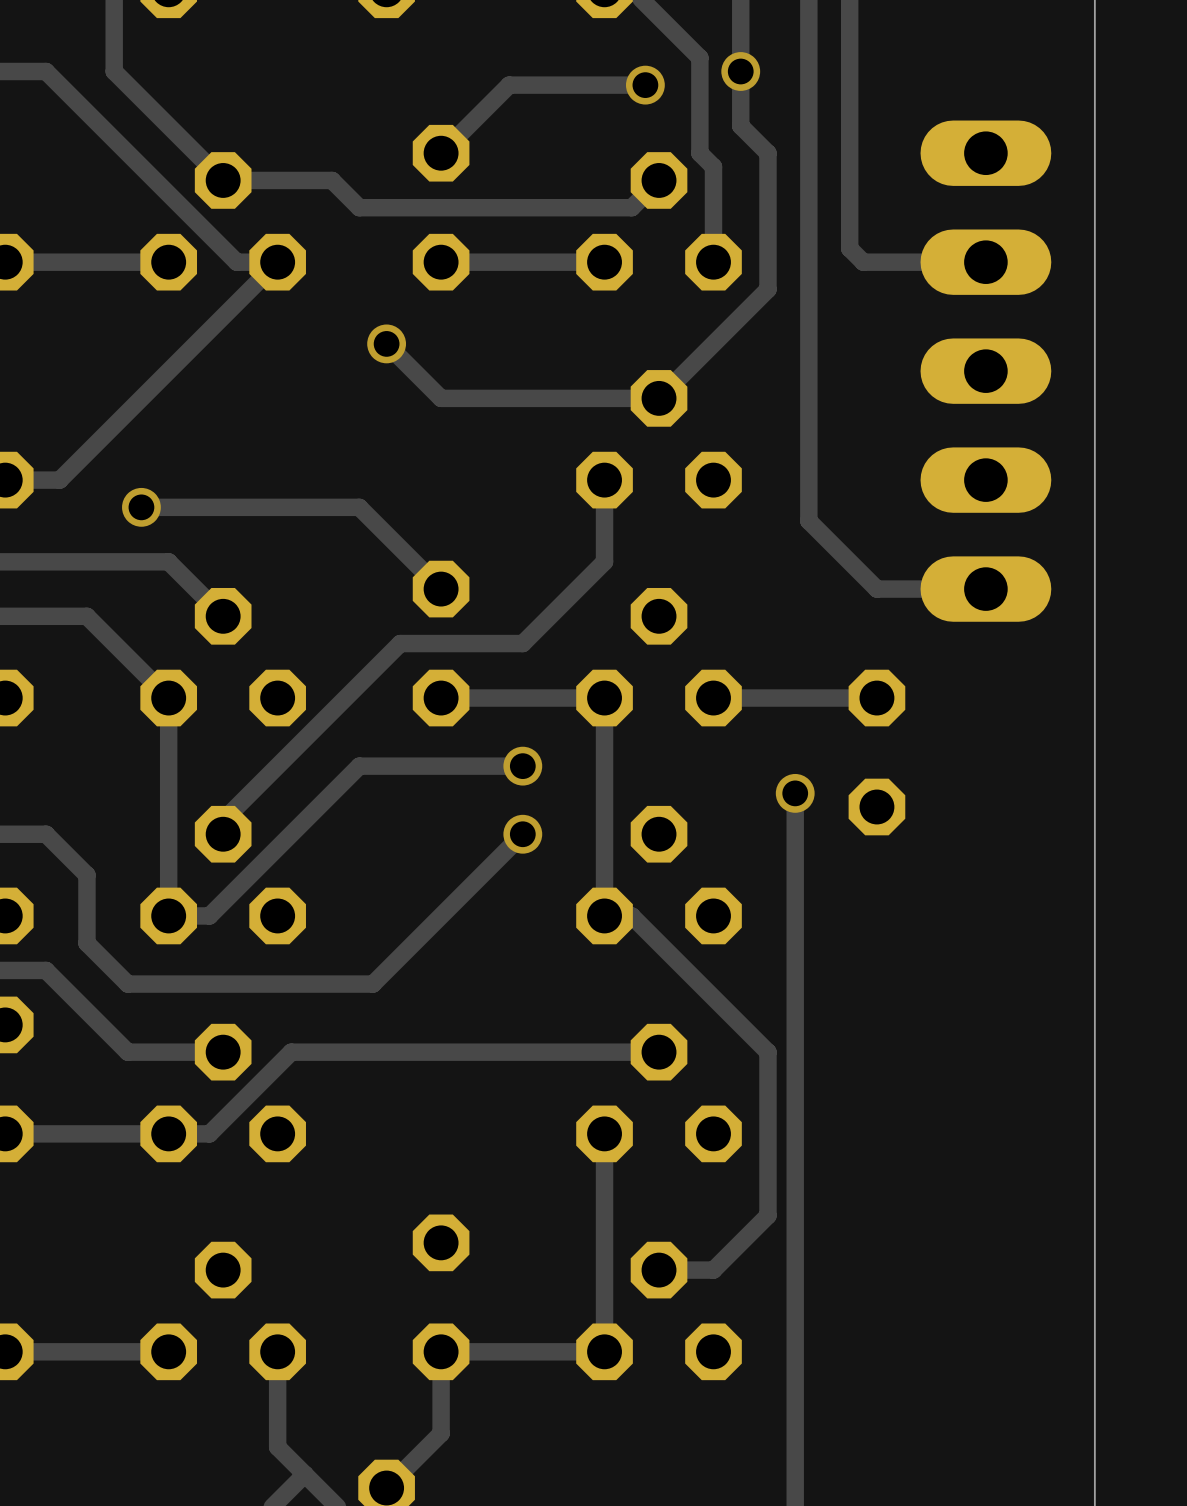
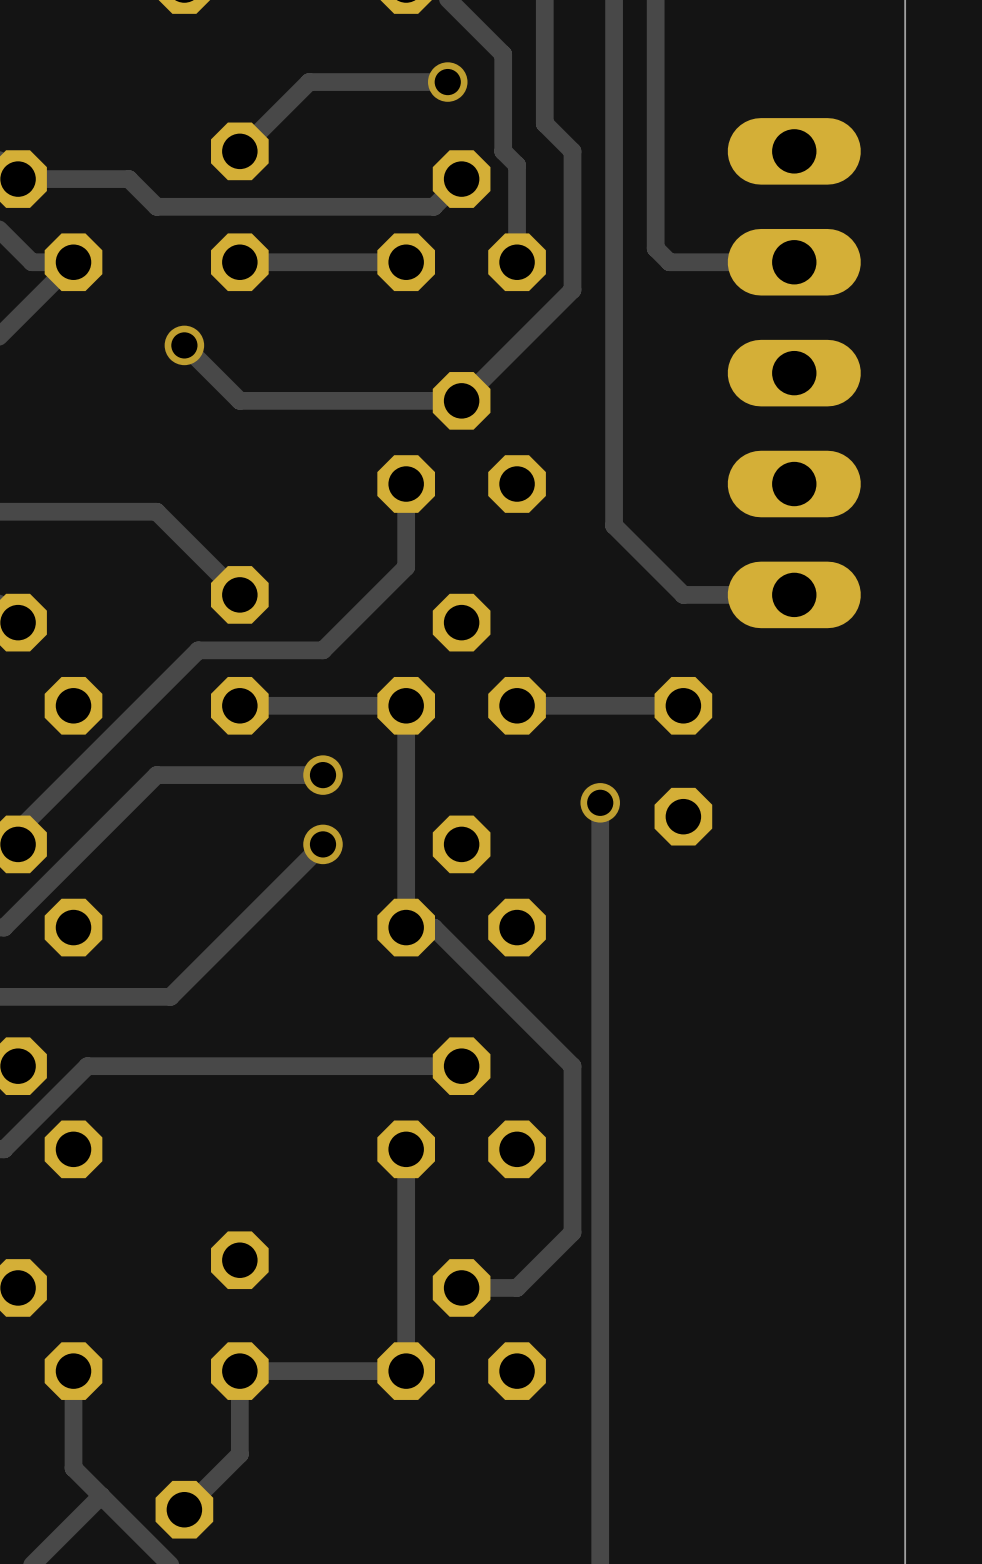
via: (740, 71) -> none

